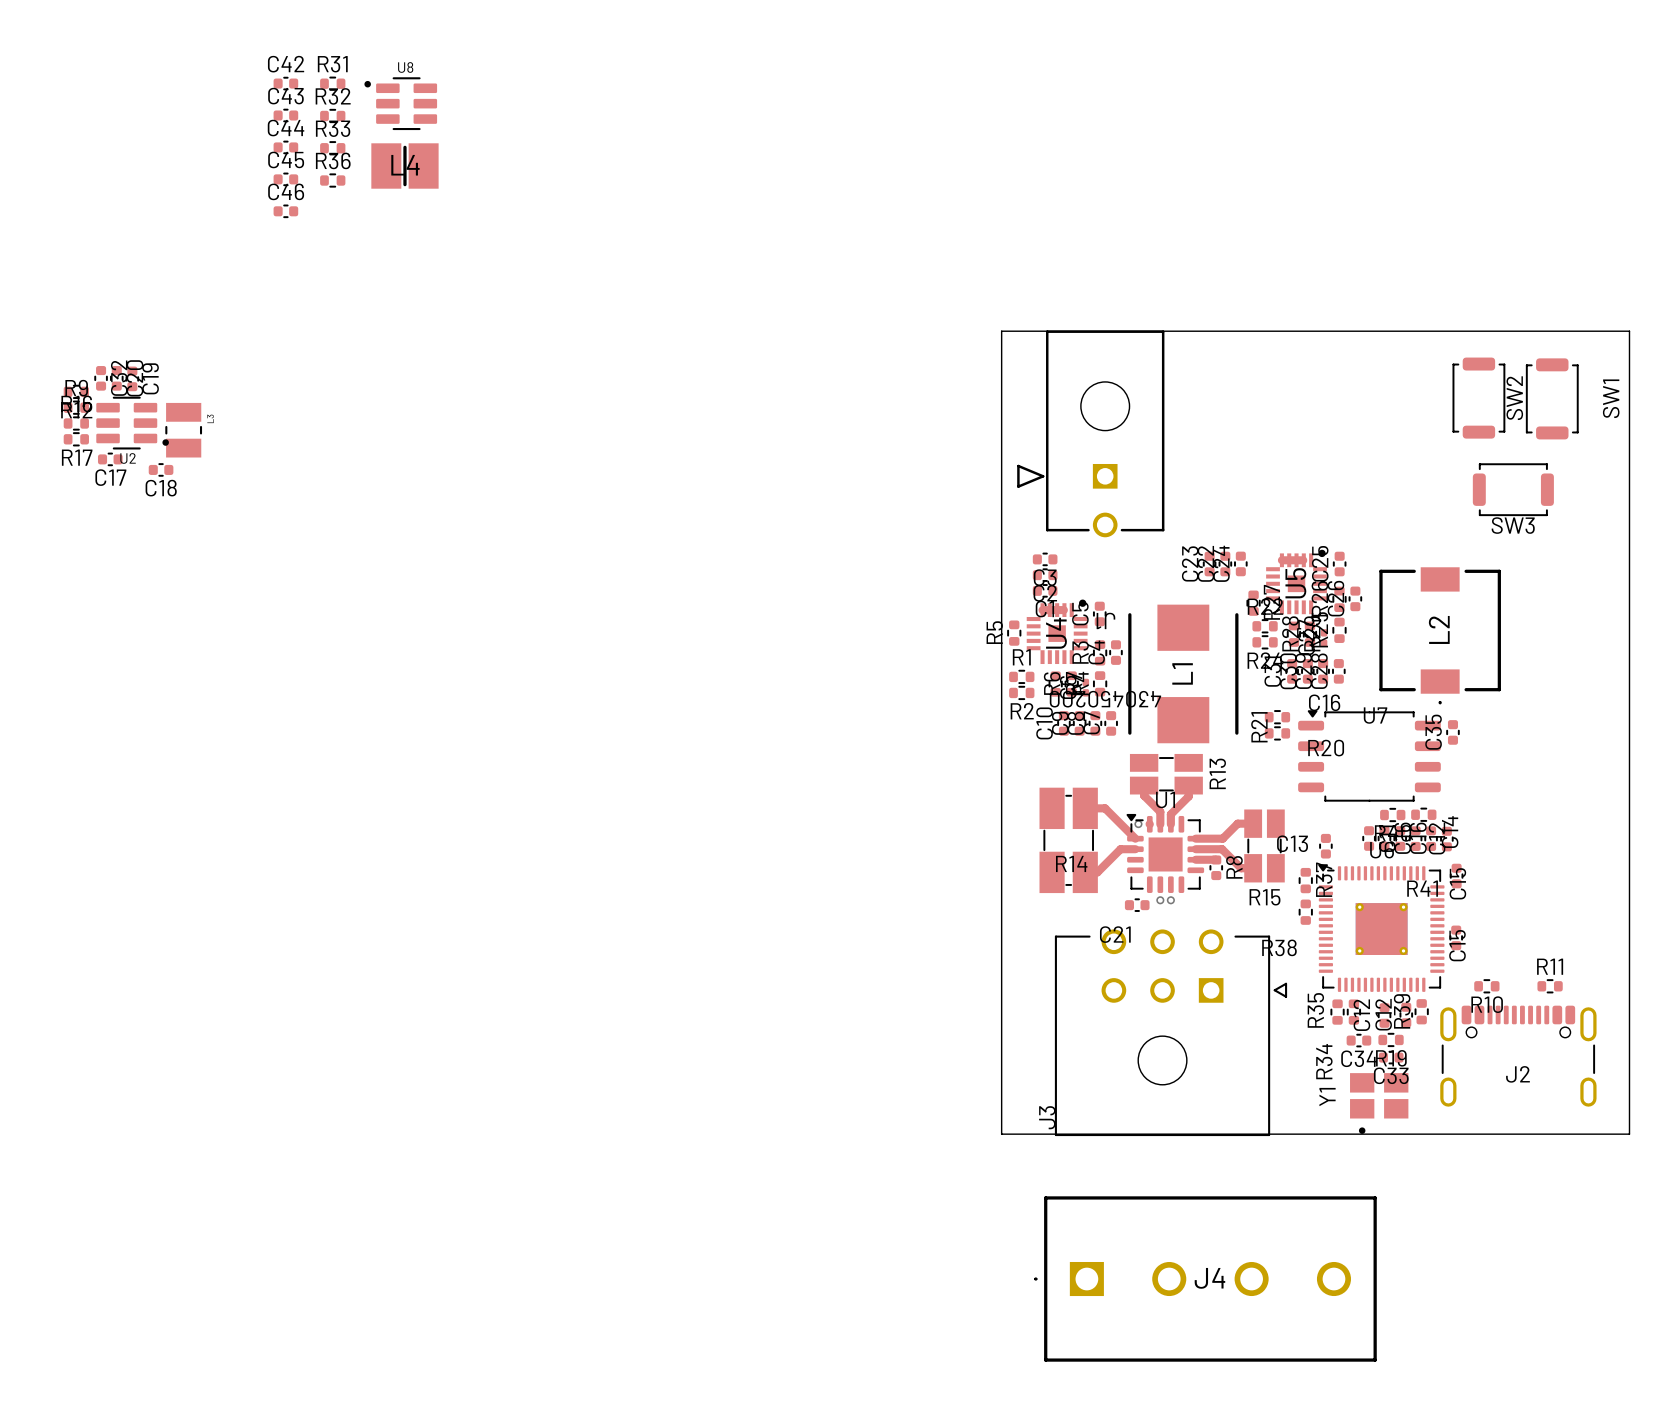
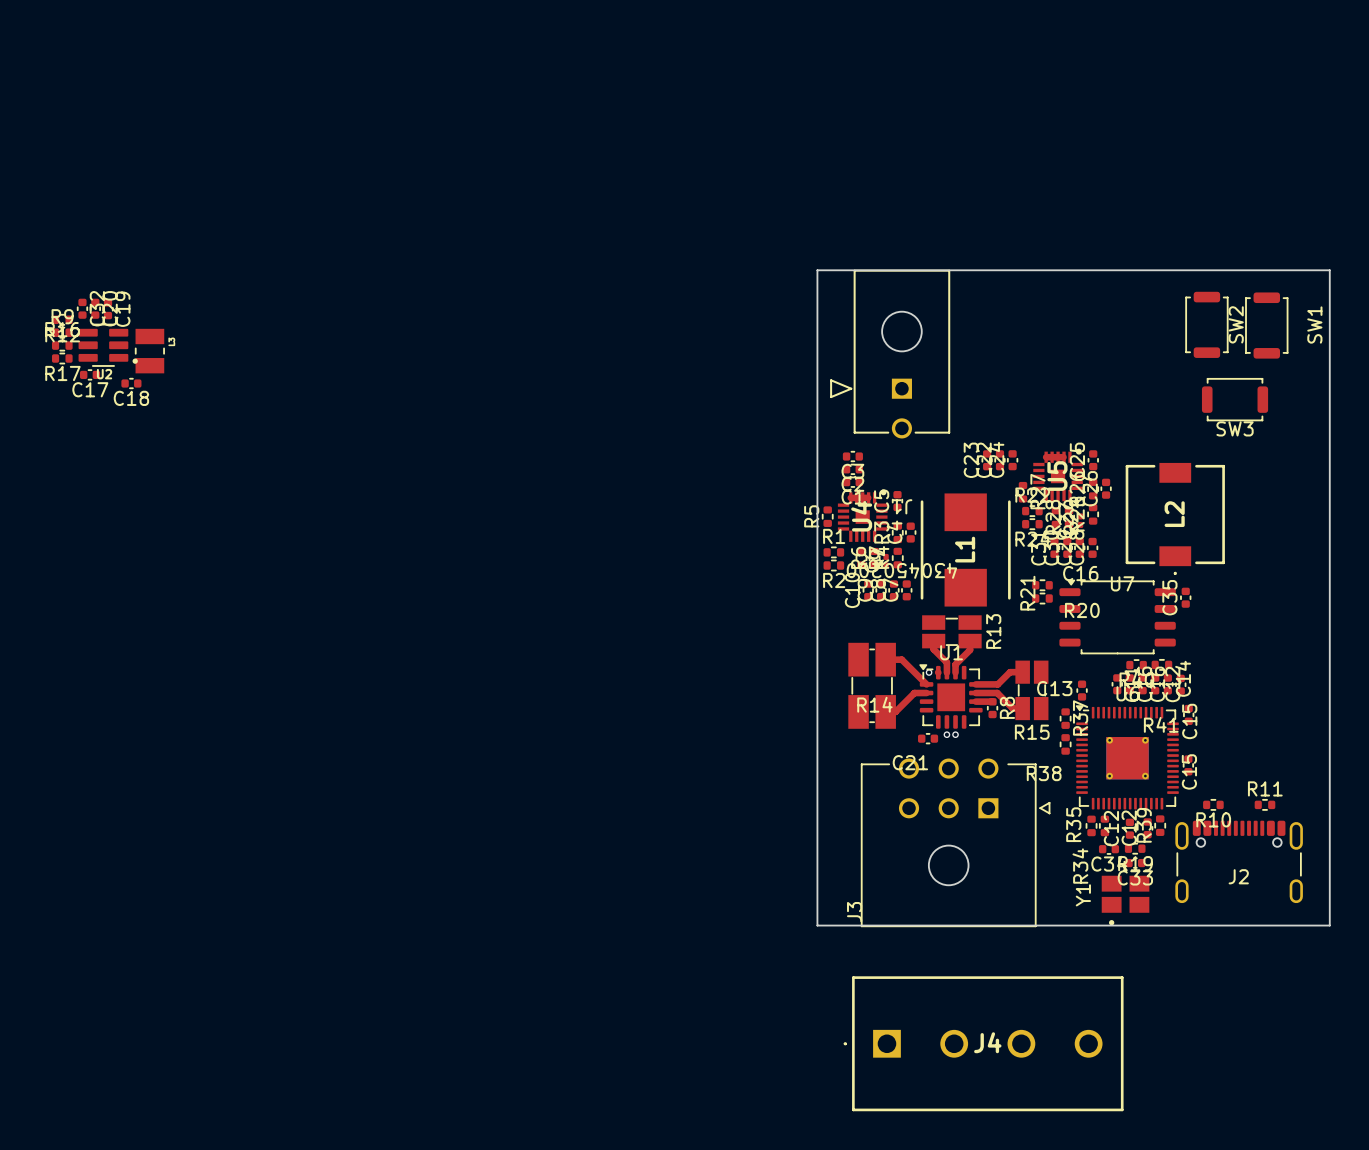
C42: (285, 83) -> none
R31: (332, 83) -> none
U8: (400, 103) -> none
C43: (285, 115) -> none
R32: (332, 115) -> none
C44: (285, 147) -> none
R33: (332, 148) -> none
L4: (404, 166) -> none
C45: (285, 179) -> none
R36: (332, 180) -> none
C46: (285, 211) -> none

